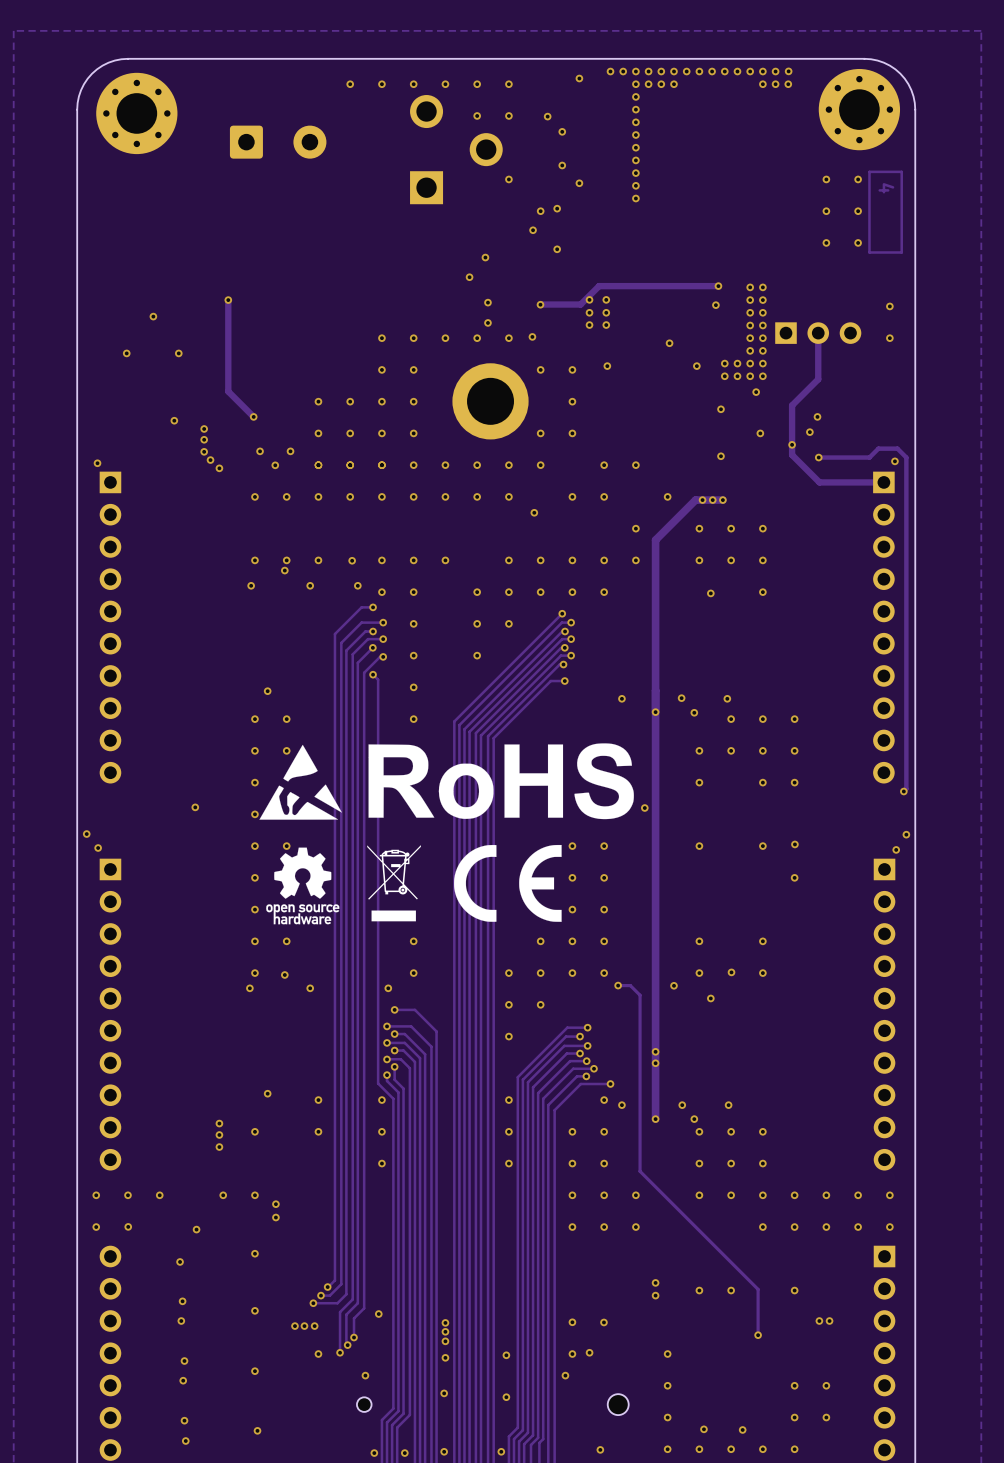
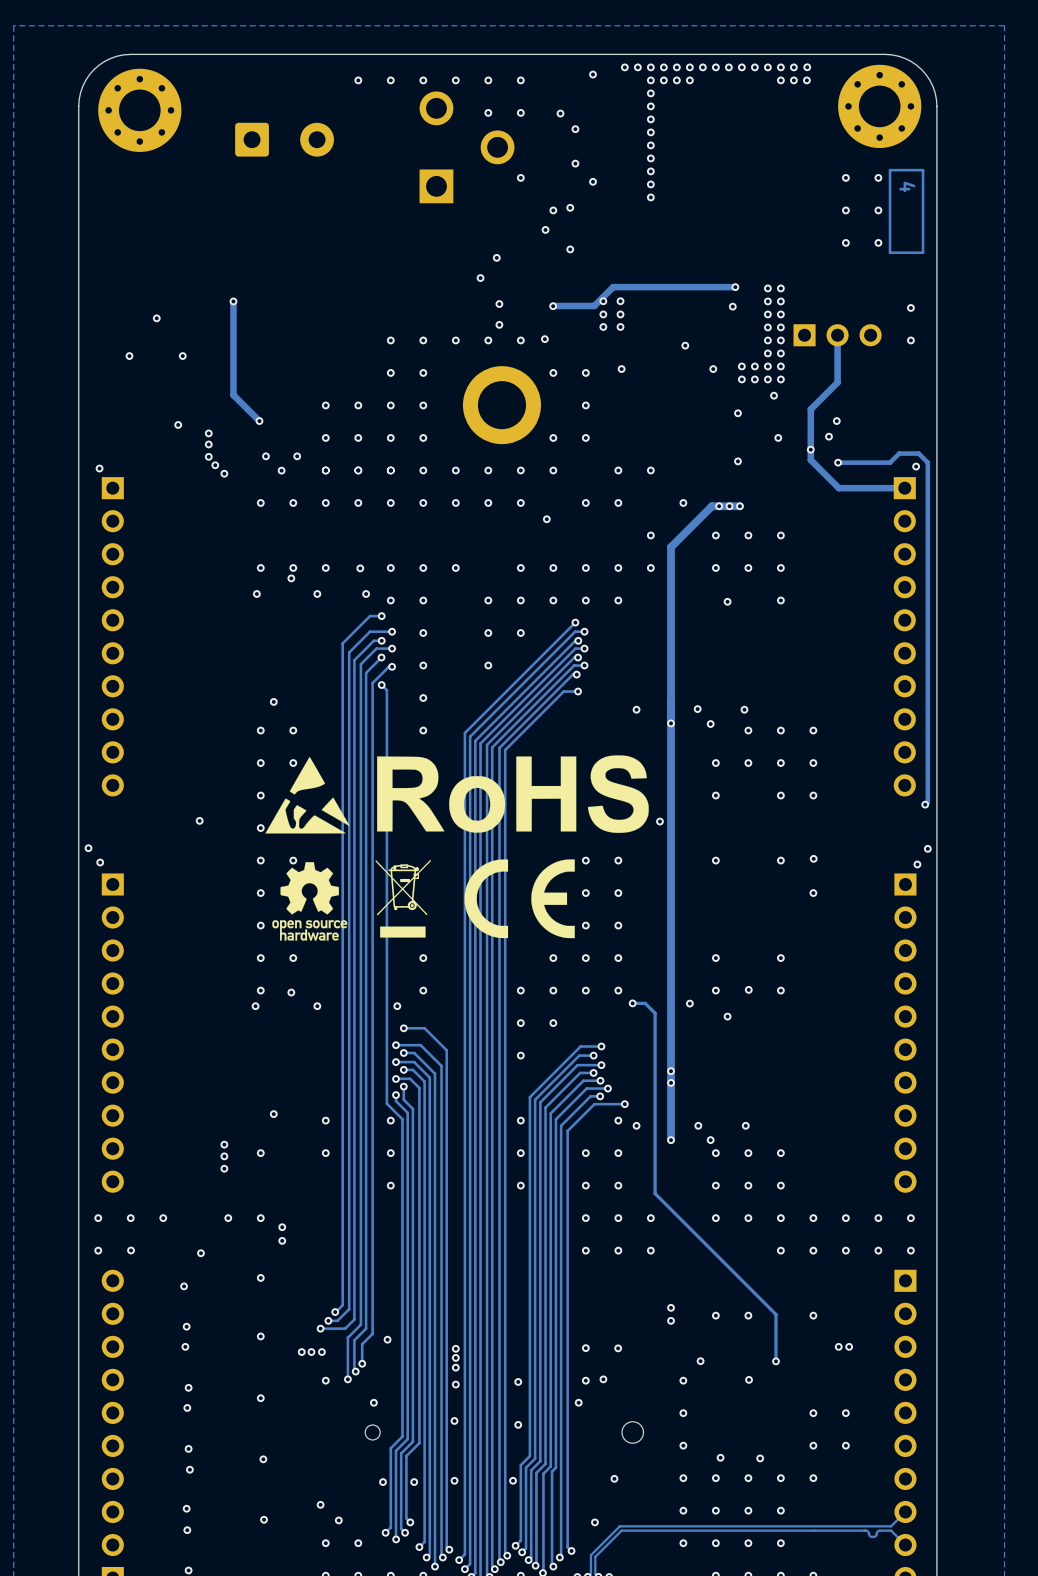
via: none -> (700, 1361)
via: none -> (749, 1379)

